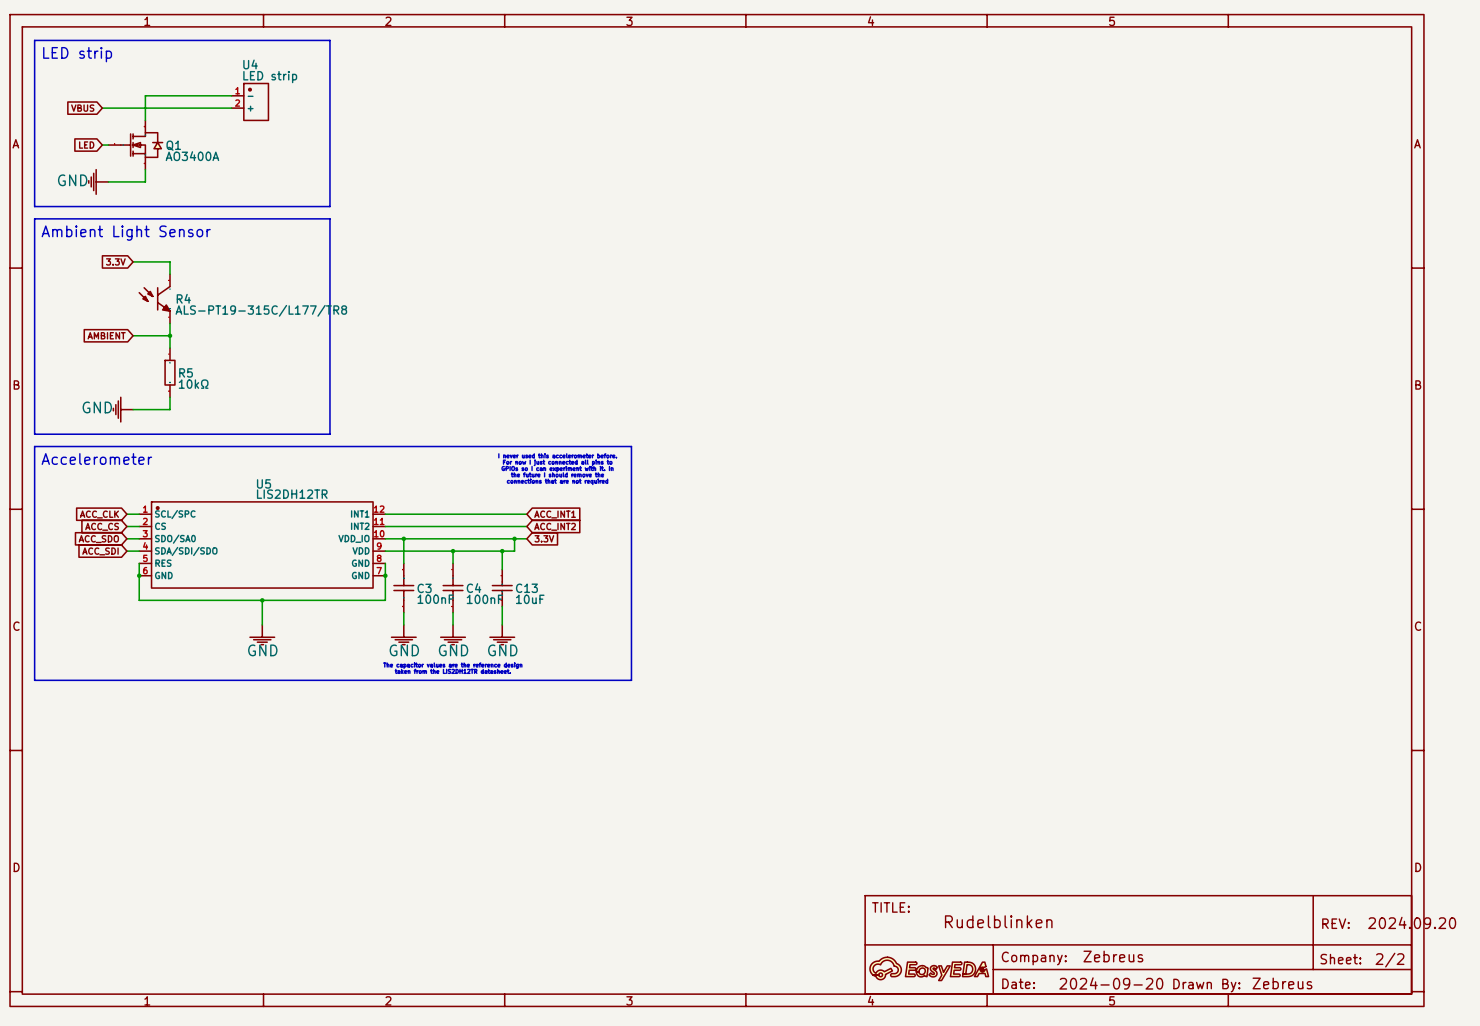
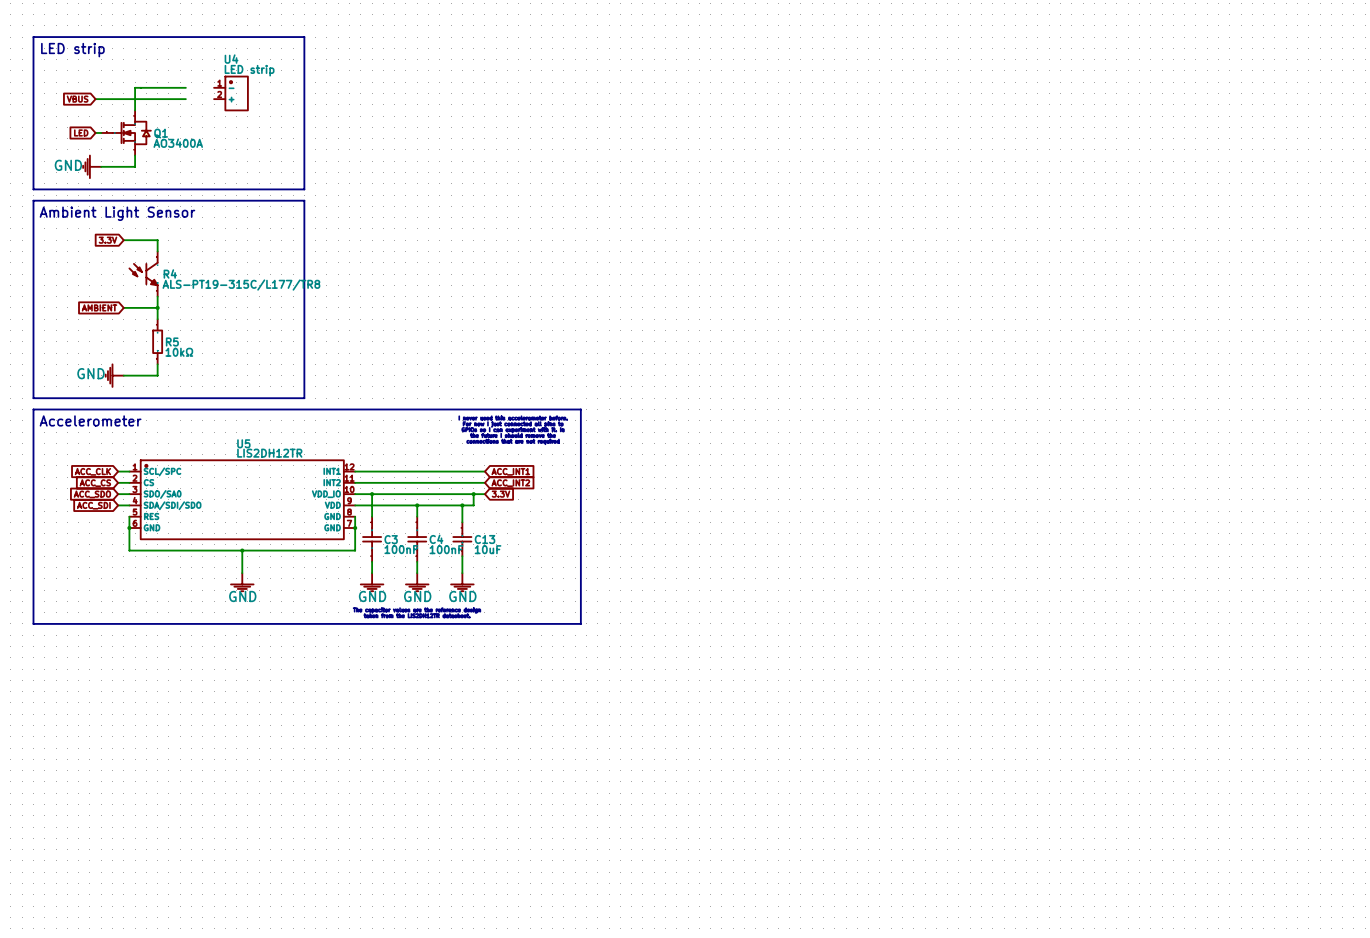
wire: (200, 95) (231, 95) -> none
wire: (200, 108) (231, 108) -> none
part: (716, 510) -> none

